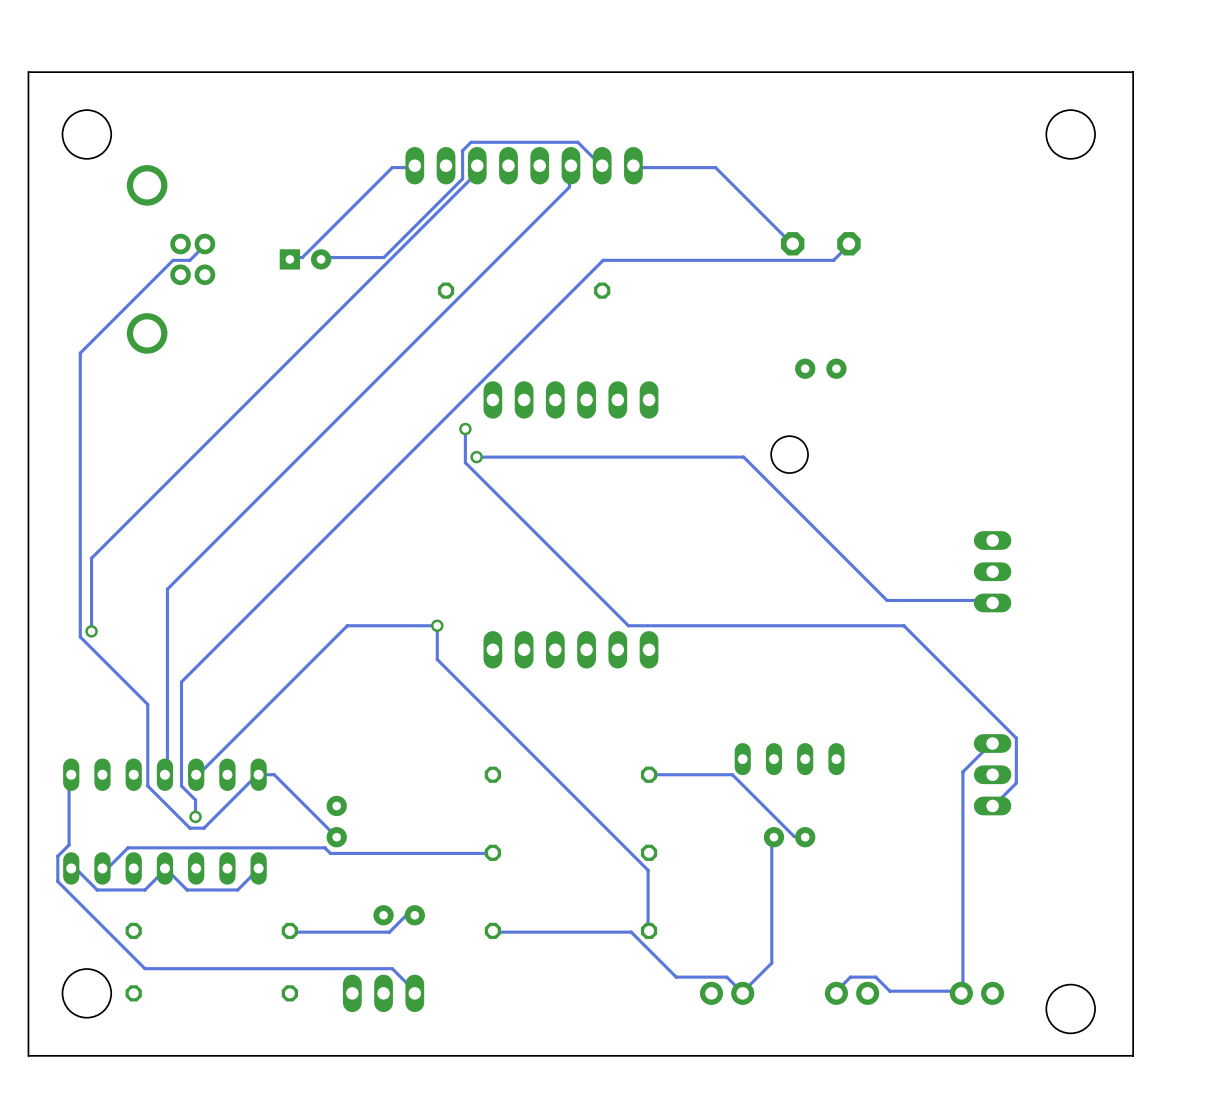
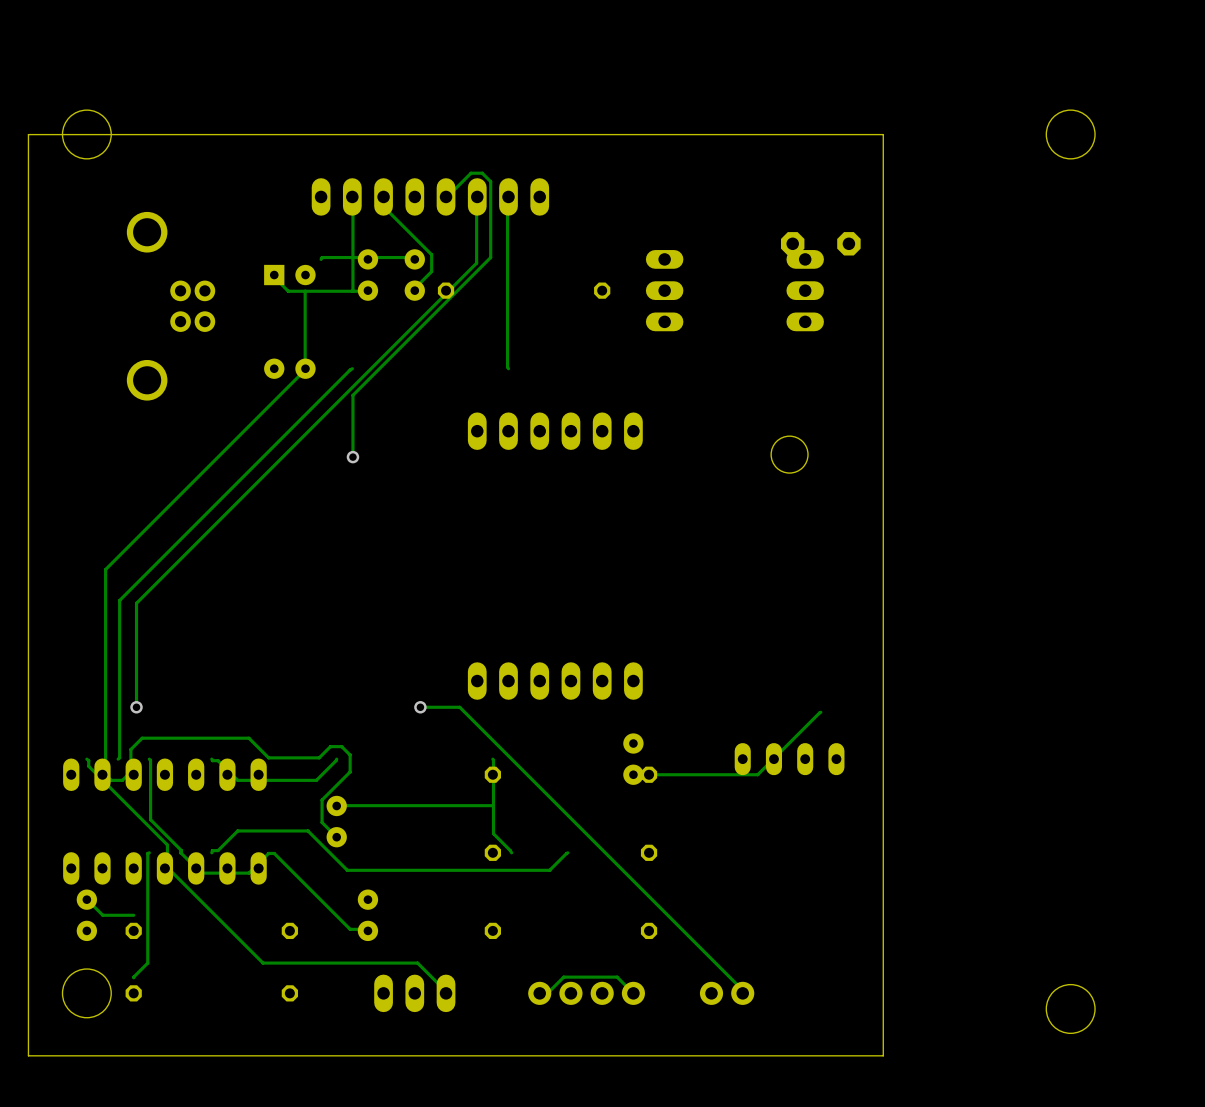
board edge: (28, 134) (28, 72) (1133, 72) (1133, 1055) (883, 1055) -> (28, 134) (883, 134) (883, 1055)
track: (414, 165) (414, 167) (392, 167) (302, 257) (291, 257) (289, 259) -> none
track: (477, 165) (476, 173) (91, 558) (91, 631) -> none
part position: (524, 165) -> (430, 196)
track: (570, 165) (569, 187) (167, 589) (167, 774) (164, 774) -> none
track: (602, 165) (577, 142) (471, 142) (462, 150) (462, 178) (383, 257) -> (414, 259) (414, 257) (383, 257)
track: (633, 165) (634, 167) (715, 167) (792, 243) -> none
track: none -> (352, 196) (352, 291)
track: none -> (383, 196) (383, 206) (431, 254) (431, 271) (414, 290)
track: none -> (446, 196) (471, 173) (482, 173) (490, 181) (490, 257) (352, 395) (352, 457)
track: none -> (477, 196) (476, 263) (136, 603) (136, 707)
track: none -> (508, 196) (508, 368)
track: (848, 243) (833, 260) (603, 260) (181, 681) (181, 785) (195, 800) (195, 816) -> none
track: (204, 244) (189, 260) (173, 260) (80, 353) (80, 637) (147, 704) (147, 785) (189, 828) (203, 828) (257, 774) (274, 774) (322, 822) -> (305, 291) (305, 369) (105, 569) (105, 774) (111, 780) (122, 780) (130, 771) (130, 749) (142, 738) (248, 738) (268, 757) (319, 757) (330, 746) (341, 746) (350, 755) (350, 771) (322, 800) (322, 822)
part position: (171, 259) -> (171, 306)
part position: (305, 259) -> (289, 275)
track: none -> (274, 275) (288, 291) (367, 290)
part: none -> (367, 275)
part: none -> (414, 275)
part: none -> (664, 290)
part: none -> (805, 290)
part: none -> (289, 368)
track: none -> (352, 368) (119, 600) (119, 757) (118, 759)
part: (820, 368) -> none
part position: (570, 399) -> (555, 431)
track: (465, 429) (465, 462) (628, 625) (903, 625) (1016, 738) (1016, 783) (992, 805) -> none
via: (465, 429) -> none
via: none -> (352, 457)
track: (476, 457) (743, 457) (887, 600) (991, 600) (992, 602) -> none
via: (476, 457) -> none
part: (992, 571) -> none
via: (437, 625) -> none
via: (91, 631) -> none
part position: (570, 649) -> (555, 681)
via: none -> (136, 707)
via: none -> (420, 707)
track: (992, 743) (962, 771) (962, 991) (961, 993) (960, 991) (889, 991) (875, 977) (850, 977) (836, 993) -> none
track: none -> (86, 759) (88, 766) (167, 845) (167, 867) (263, 963) (417, 963) (446, 993)
track: none -> (149, 759) (150, 819) (201, 873) (248, 873) (268, 853) (274, 853) (350, 929) (367, 930)
track: none -> (336, 759) (316, 780) (237, 780) (218, 760) (211, 759)
track: none -> (492, 759) (493, 833) (511, 852)
part: none -> (633, 759)
track: (71, 774) (69, 774) (69, 845) (57, 856) (57, 881) (144, 968) (392, 968) (414, 993) -> none
track: (196, 774) (198, 774) (347, 625) (437, 625) (437, 659) (648, 870) (649, 930) -> none
track: (732, 774) (794, 836) (805, 837) -> (732, 774) (757, 774) (820, 712)
part: (992, 774) -> none
track: none -> (493, 805) (336, 805)
via: (195, 816) -> none
track: (773, 837) (771, 839) (771, 963) (743, 991) -> (420, 707) (459, 707) (743, 991)
part: (789, 837) -> none
track: (324, 847) (128, 847) (108, 867) (102, 868) -> (324, 847) (307, 830) (237, 830) (218, 850) (212, 850) (211, 852)
track: none -> (149, 852) (147, 853) (147, 963) (133, 977)
track: (492, 852) (330, 853) -> (567, 852) (549, 870) (347, 870) (330, 853)
track: (258, 868) (237, 889) (187, 889) (164, 868) (144, 889) (97, 889) (77, 870) (71, 870) (71, 868) -> none
track: none -> (86, 899) (102, 915) (133, 915)
part: none -> (86, 915)
part rotation: 0° (399, 915) -> 90° clockwise (367, 915)
part position: (399, 915) -> (367, 915)
track: (414, 915) (406, 915) (389, 932) (289, 930) -> none
track: (492, 930) (631, 932) (676, 977) (726, 977) (742, 993) -> none
part position: (383, 993) -> (414, 993)
part: none -> (555, 993)
part: none -> (617, 993)
track: none -> (633, 993) (617, 977) (563, 977) (549, 991) (541, 991) (539, 993)
part: (852, 993) -> none
part: (976, 993) -> none

